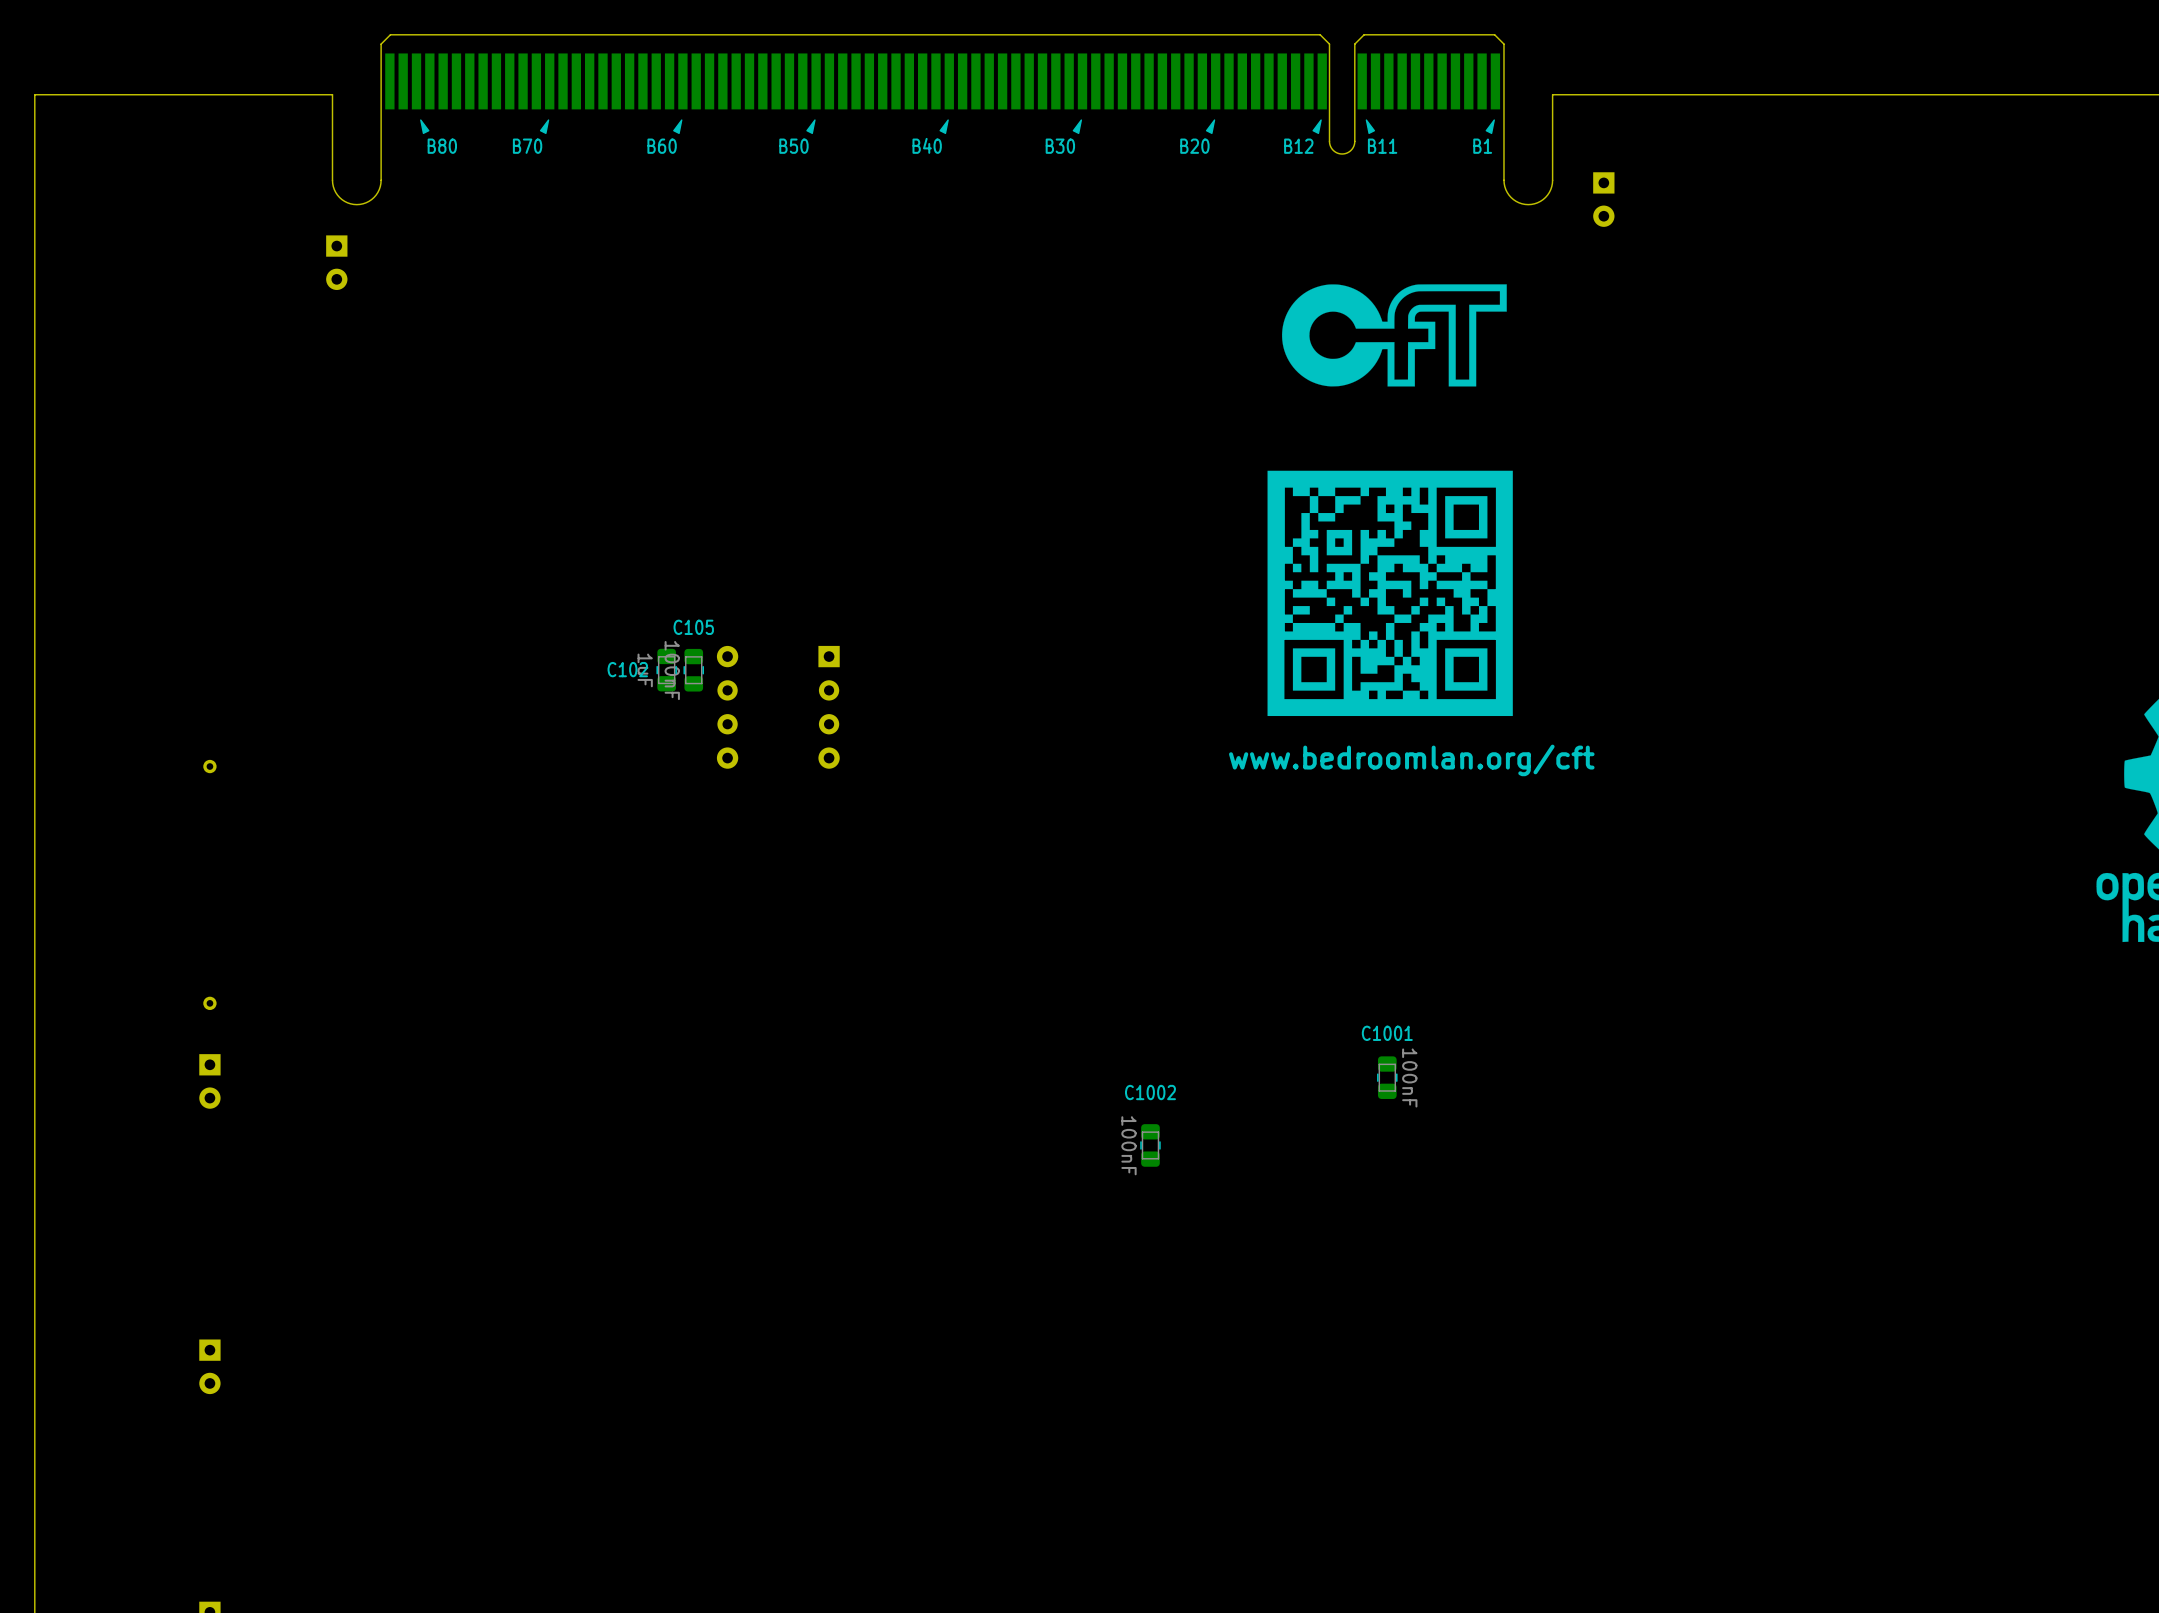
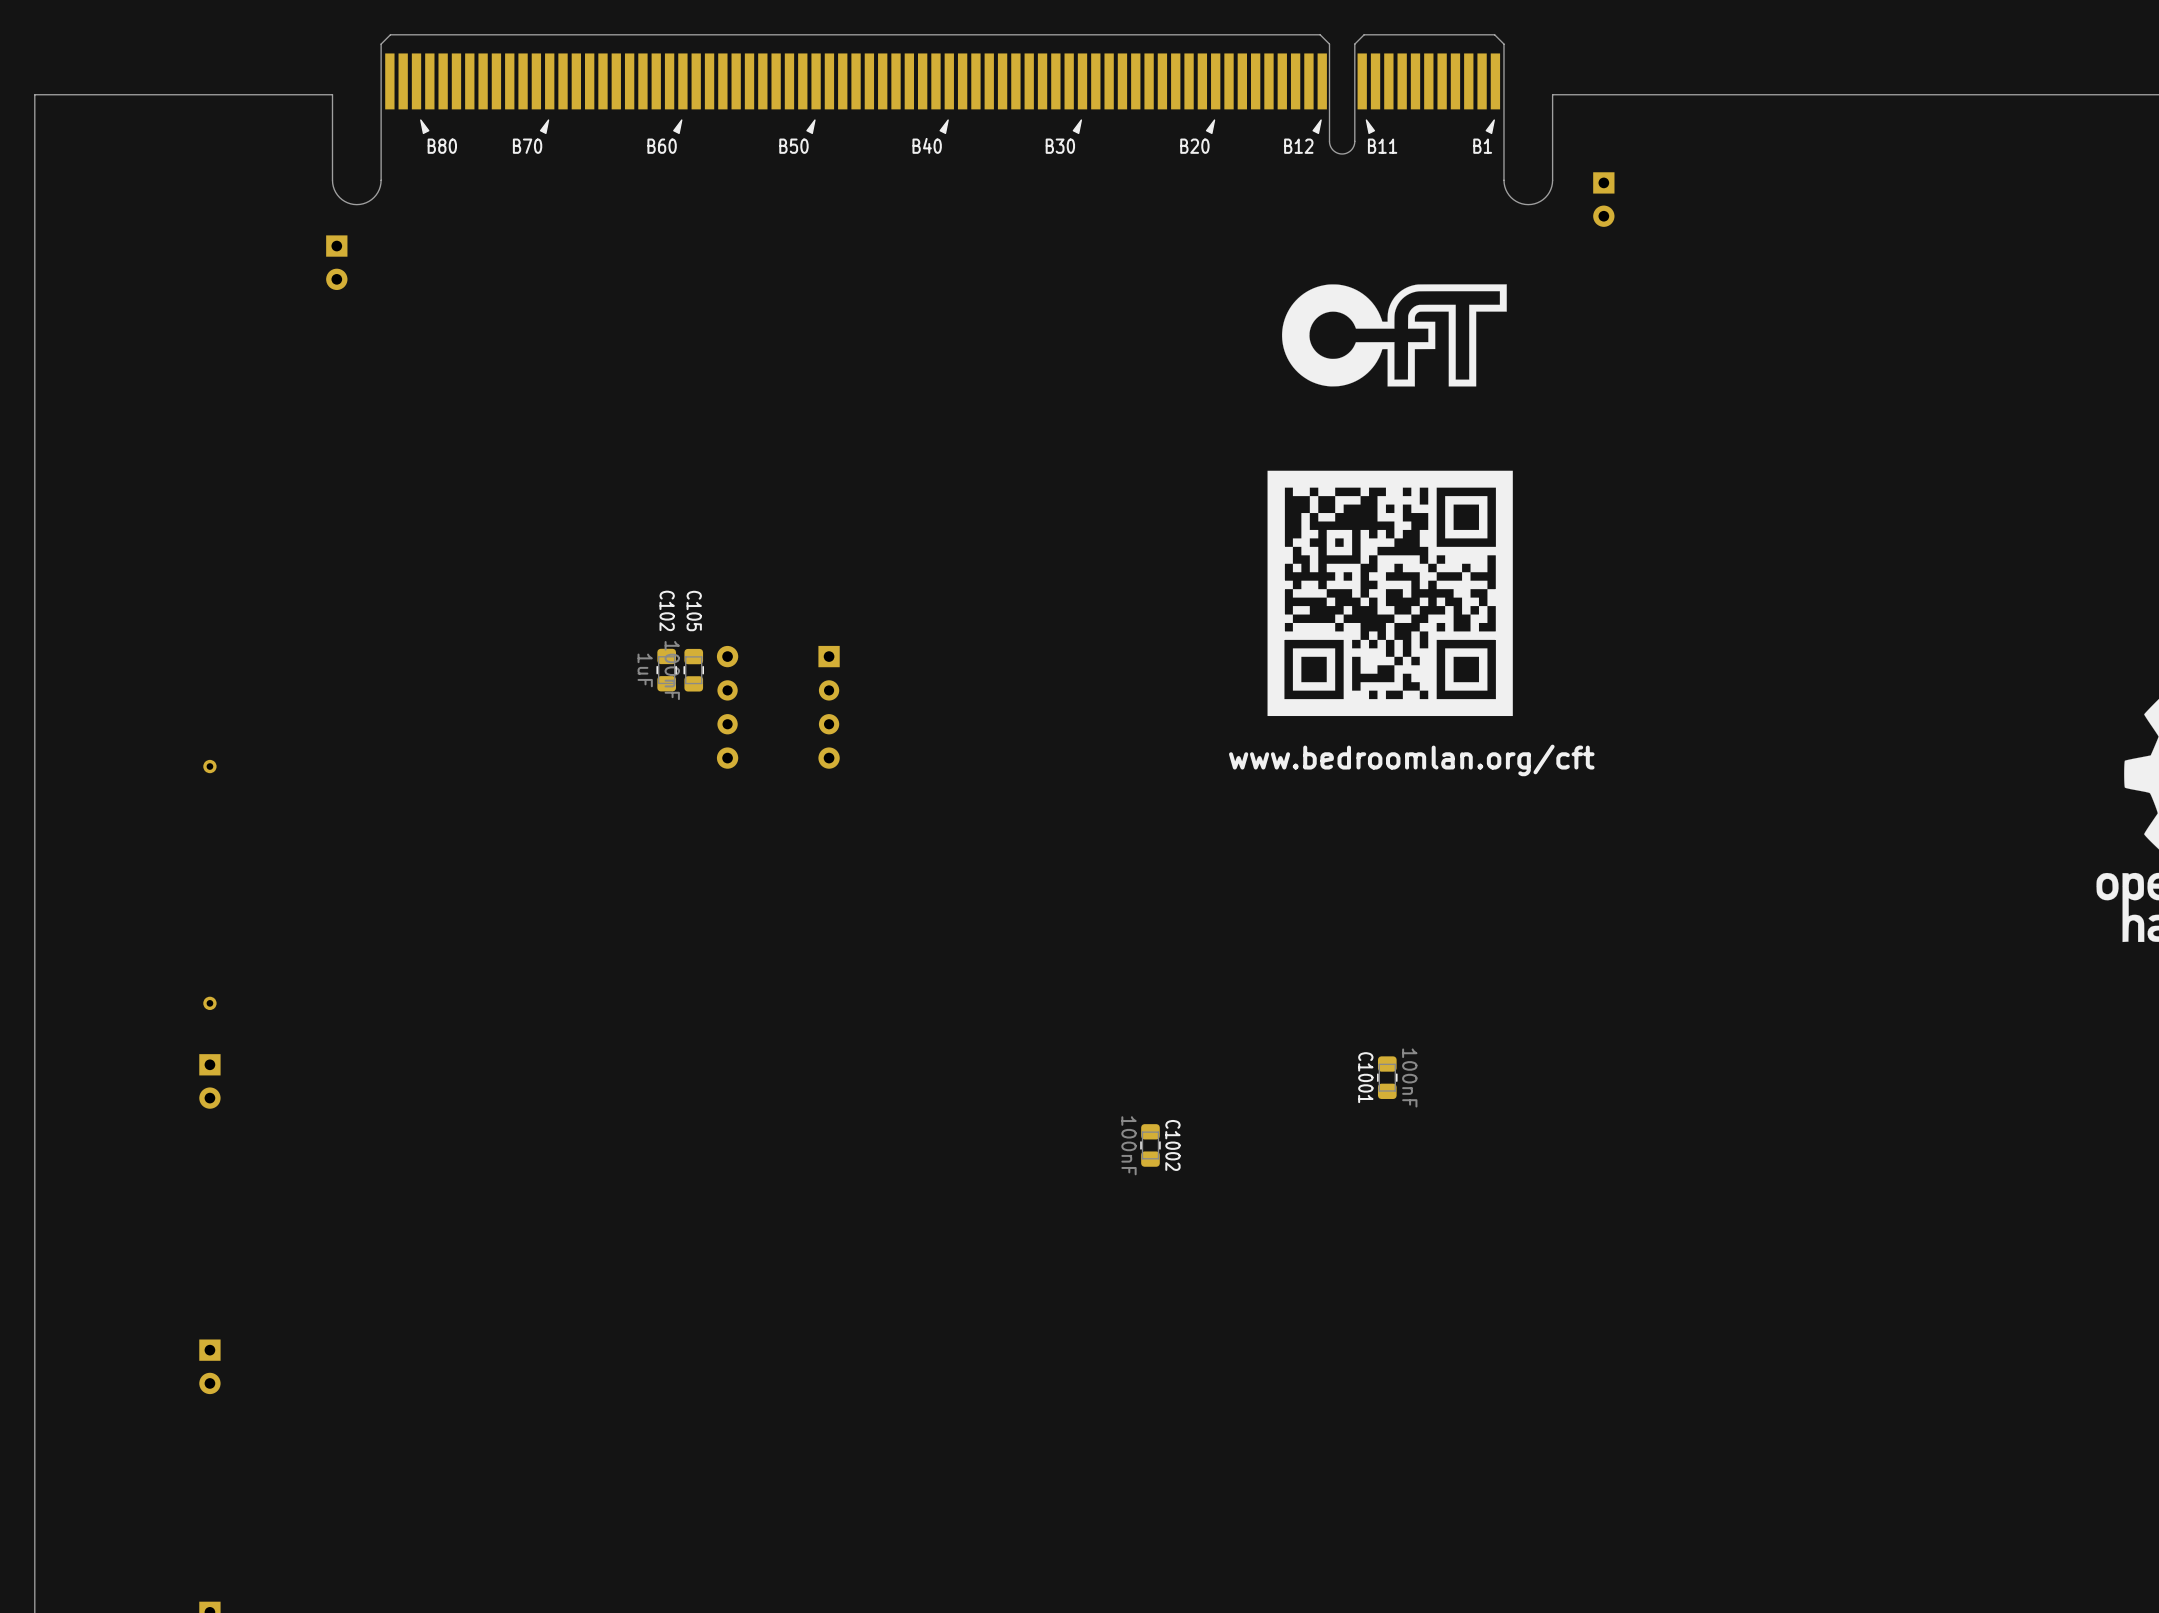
C105 name rotation: 0° (693, 627) -> 90° clockwise (694, 611)
C102 name rotation: 0° (627, 669) -> 90° clockwise (667, 610)
C102 name position: C102 (627, 669) -> C102 (667, 610)
C1001 name rotation: 0° (1387, 1033) -> 90° clockwise (1365, 1077)
C1002 name rotation: 0° (1150, 1092) -> 90° clockwise (1172, 1145)

